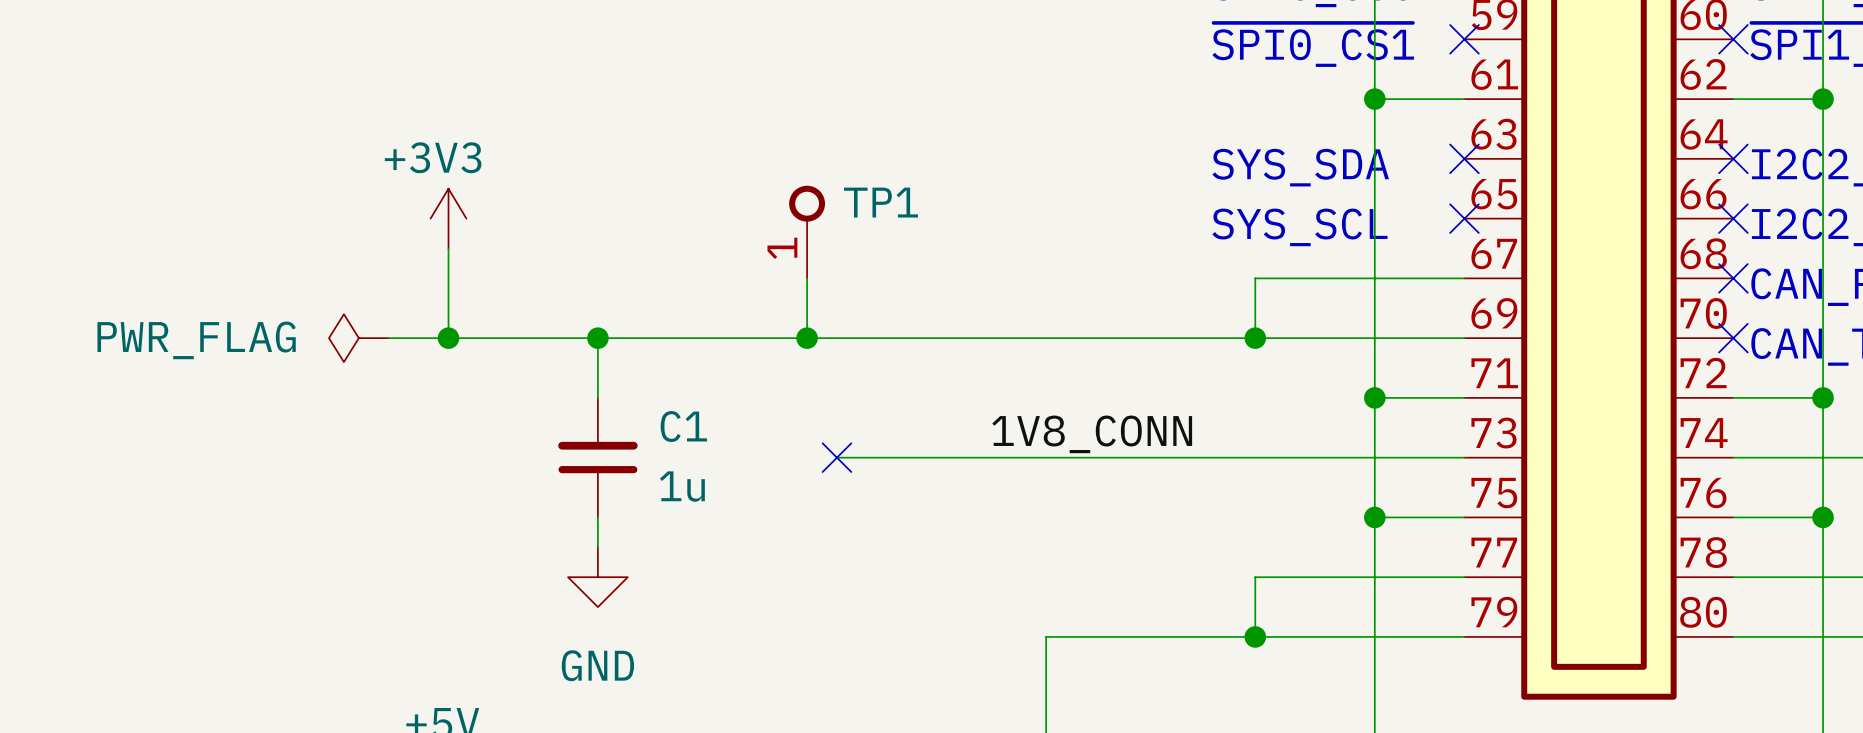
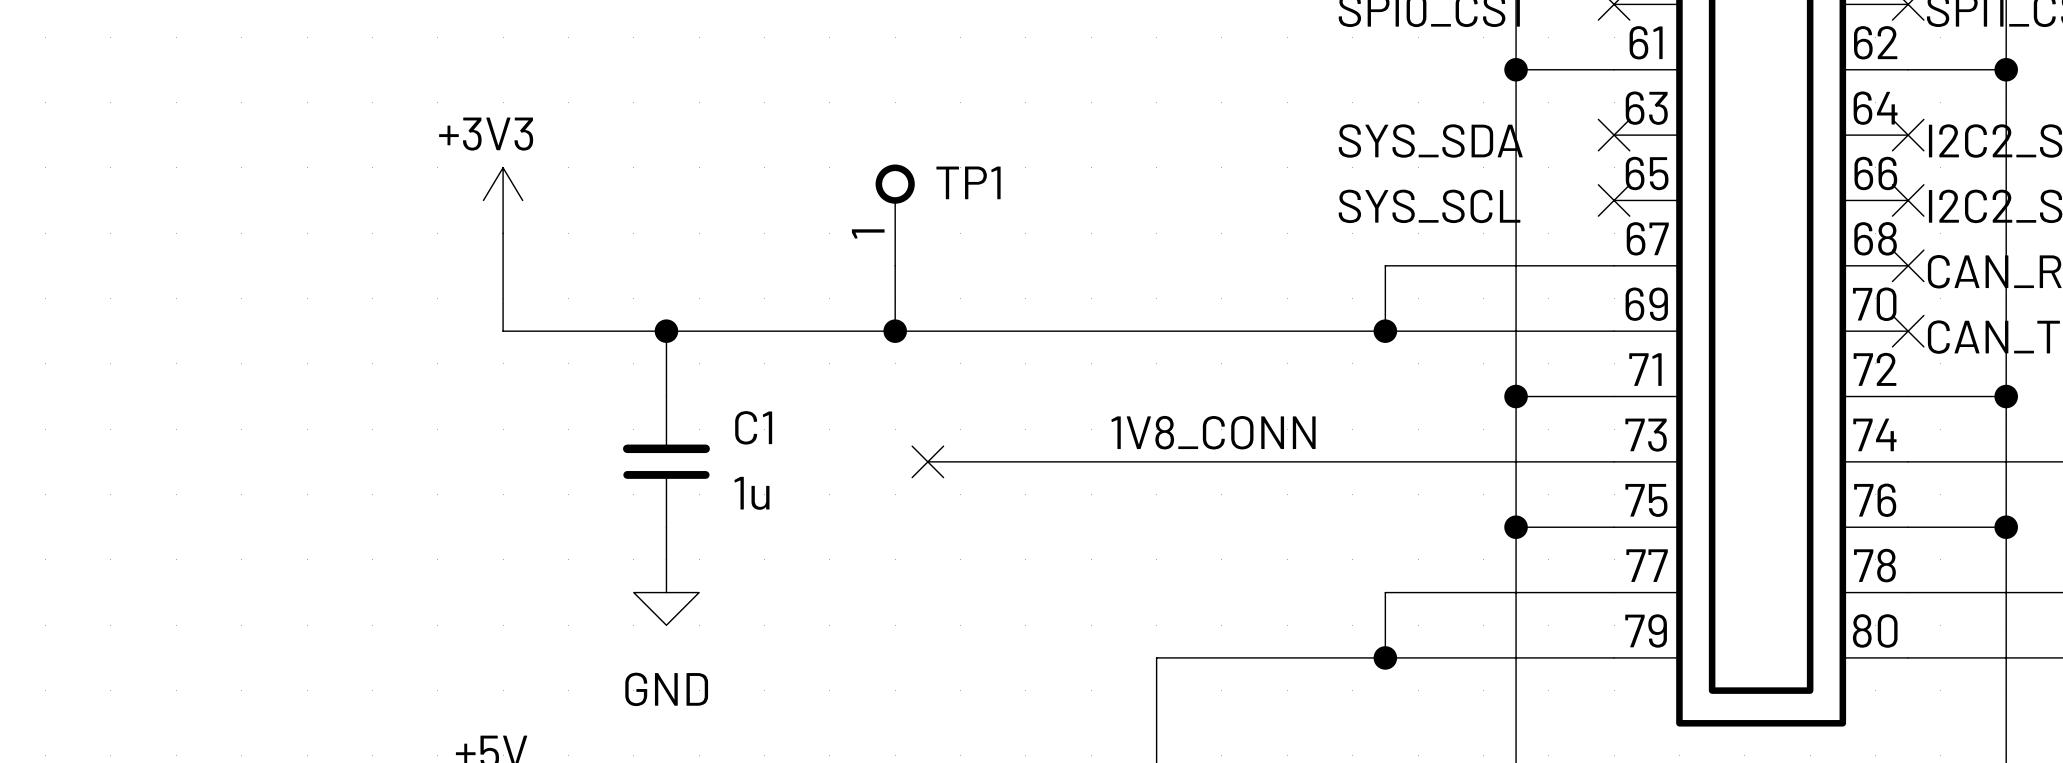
power symbol: PWR_FLAG (358, 338) -> none
wire: (388, 338) (448, 338) -> none
junction: (448, 338) -> none

